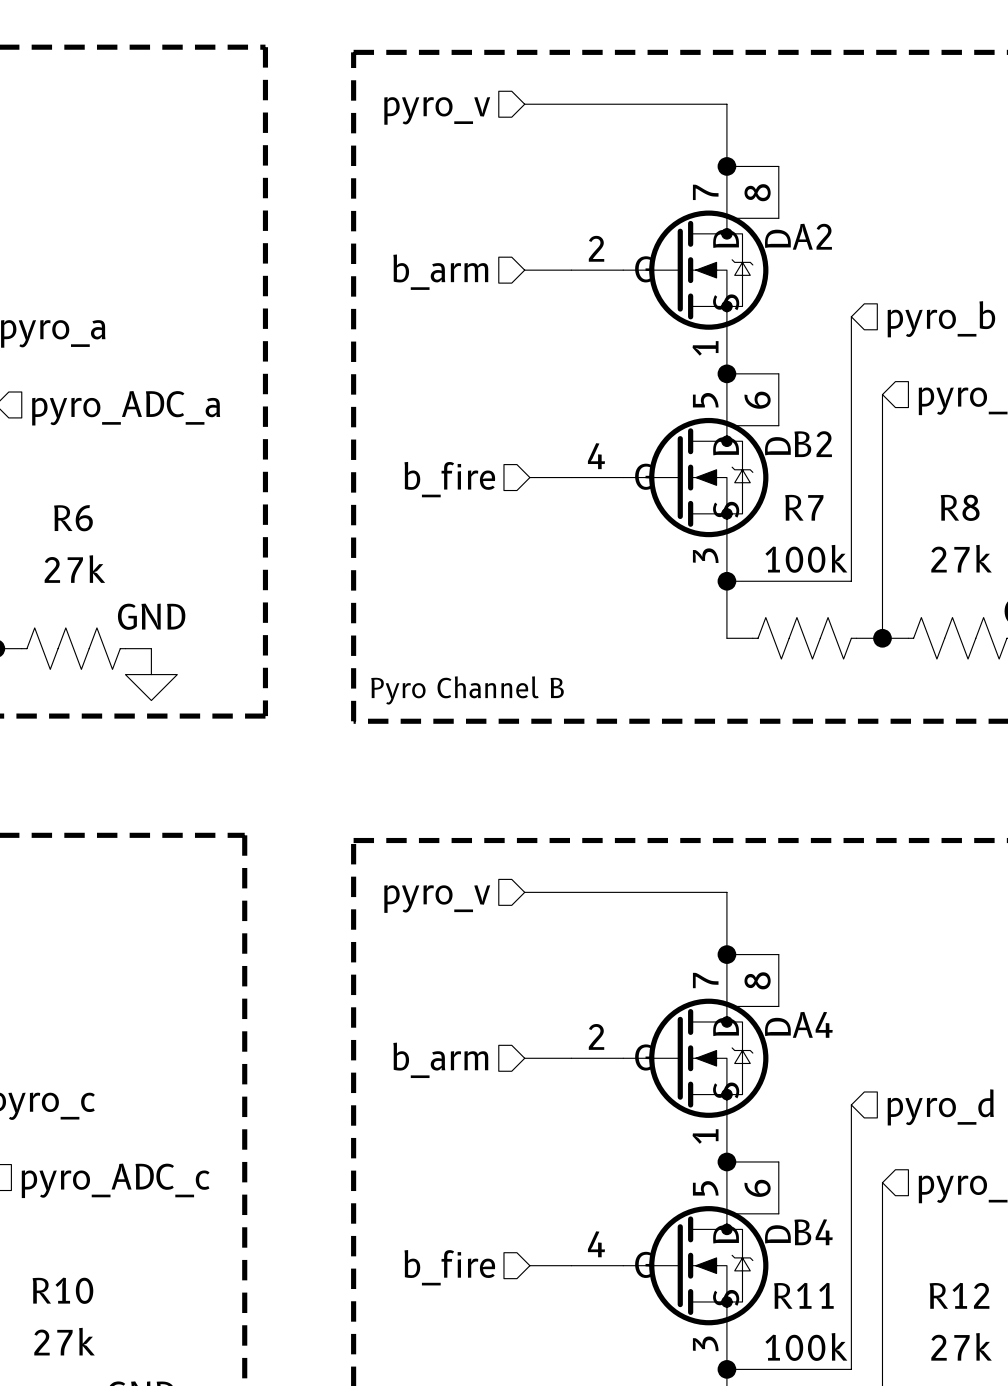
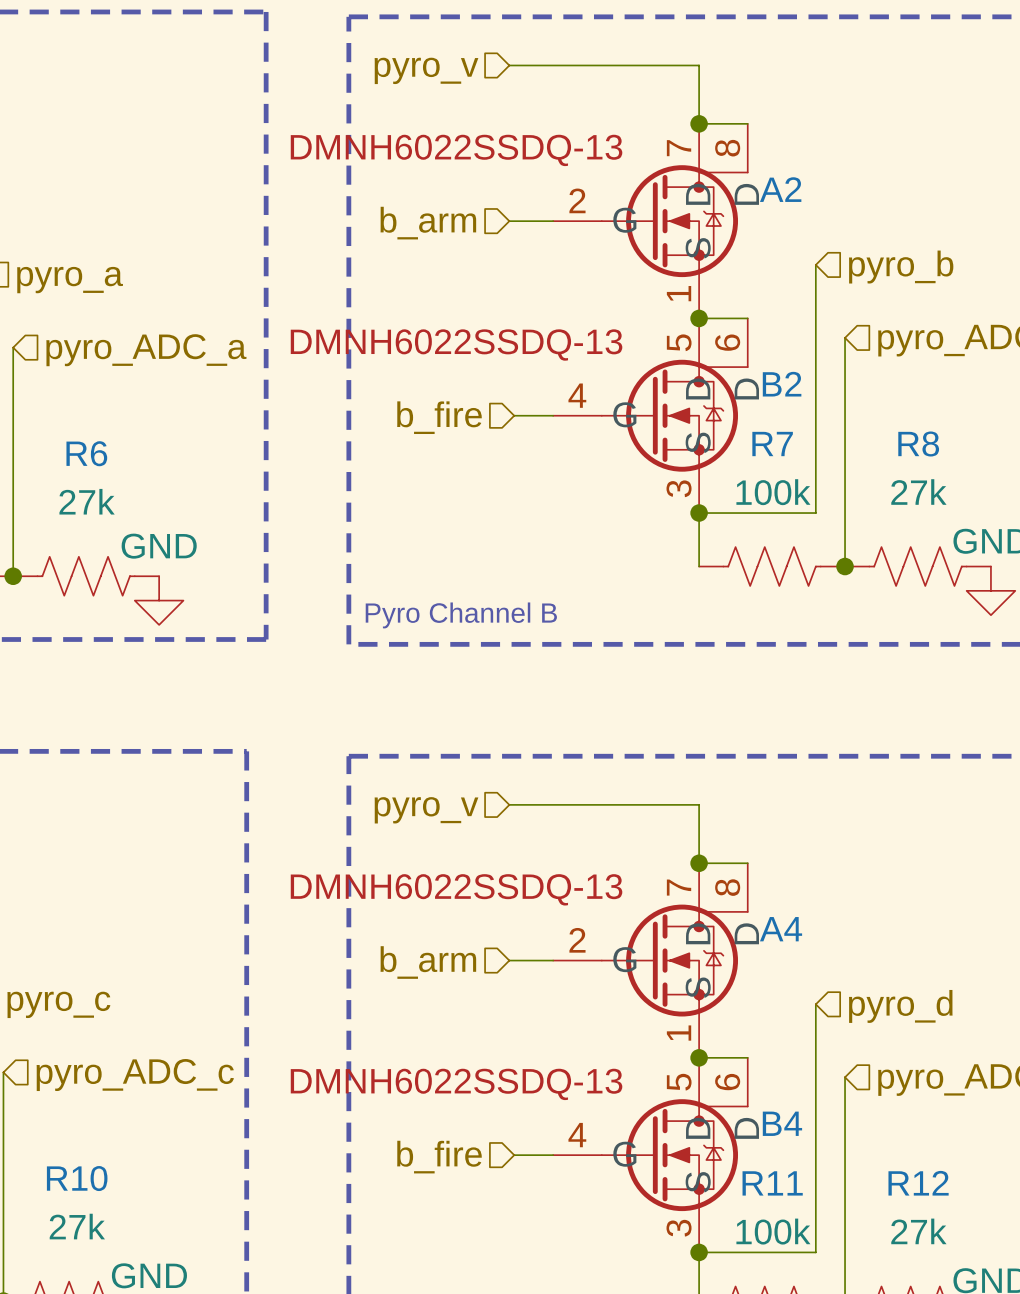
A2 text: none -> DMNH6022SSDQ-13 (456, 150)
B2 text: none -> DMNH6022SSDQ-13 (456, 345)
A4 text: none -> DMNH6022SSDQ-13 (456, 889)
B4 text: none -> DMNH6022SSDQ-13 (456, 1084)

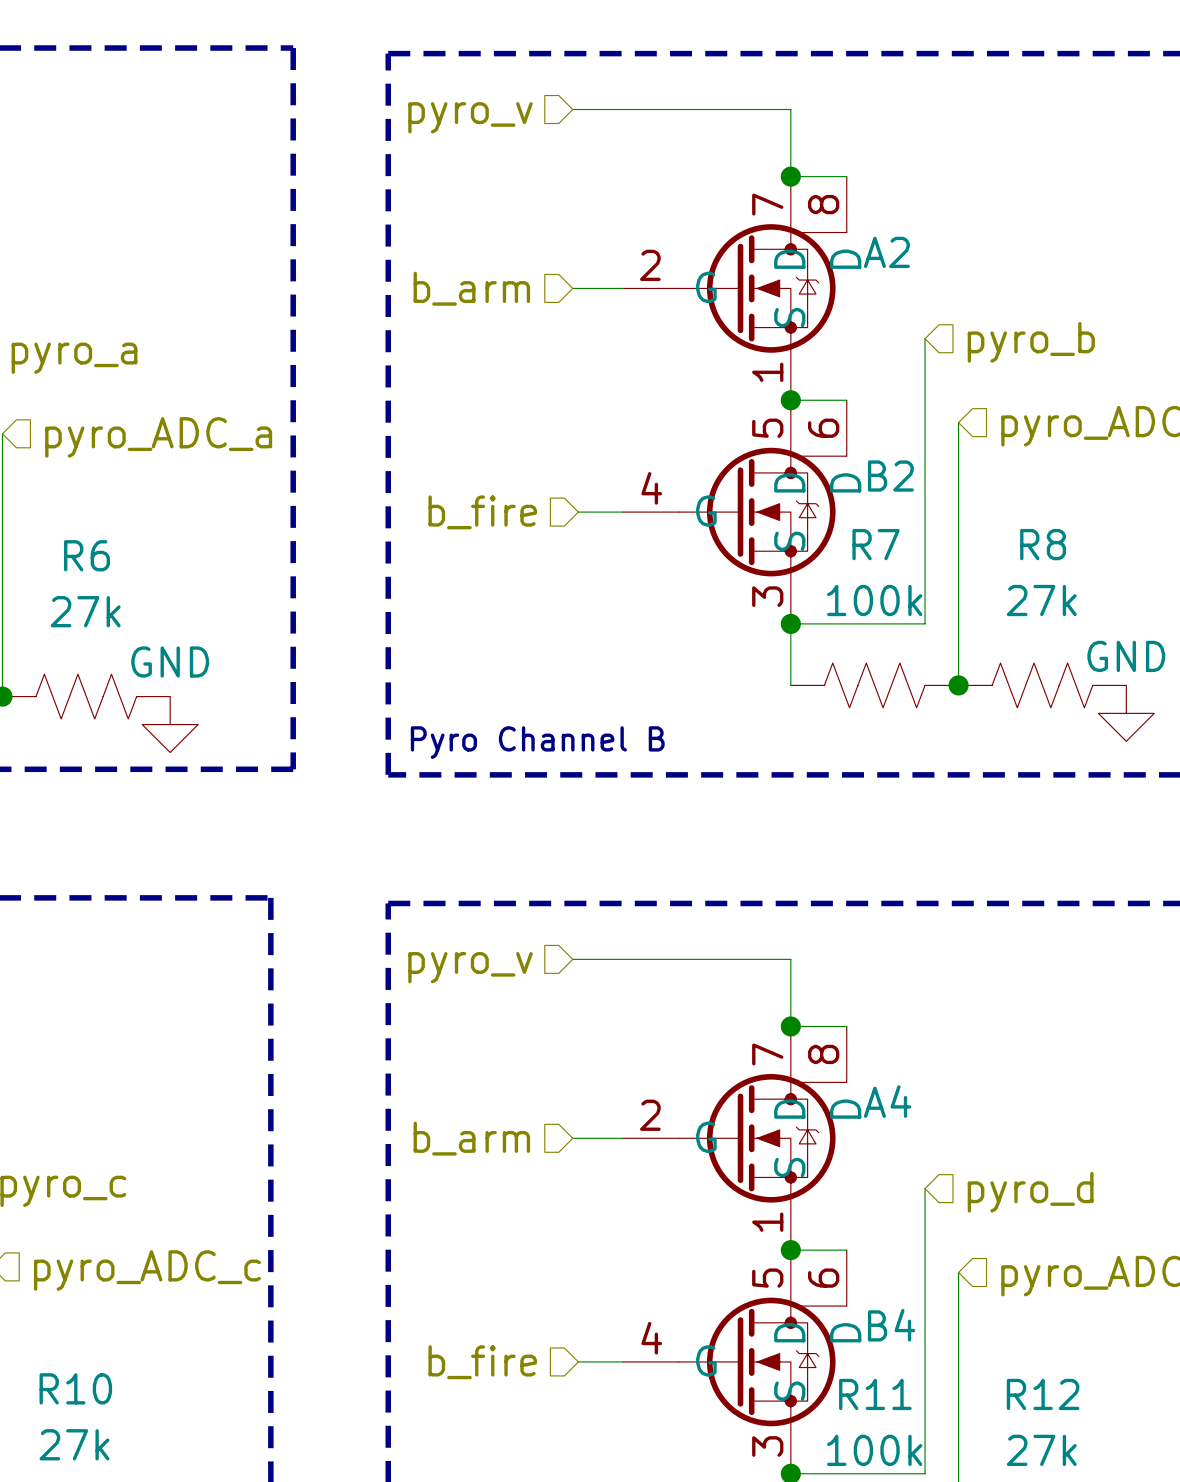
A2 text: DMNH6022SSDQ-13 (456, 150) -> none
B2 text: DMNH6022SSDQ-13 (456, 345) -> none
A4 text: DMNH6022SSDQ-13 (456, 889) -> none
B4 text: DMNH6022SSDQ-13 (456, 1084) -> none

